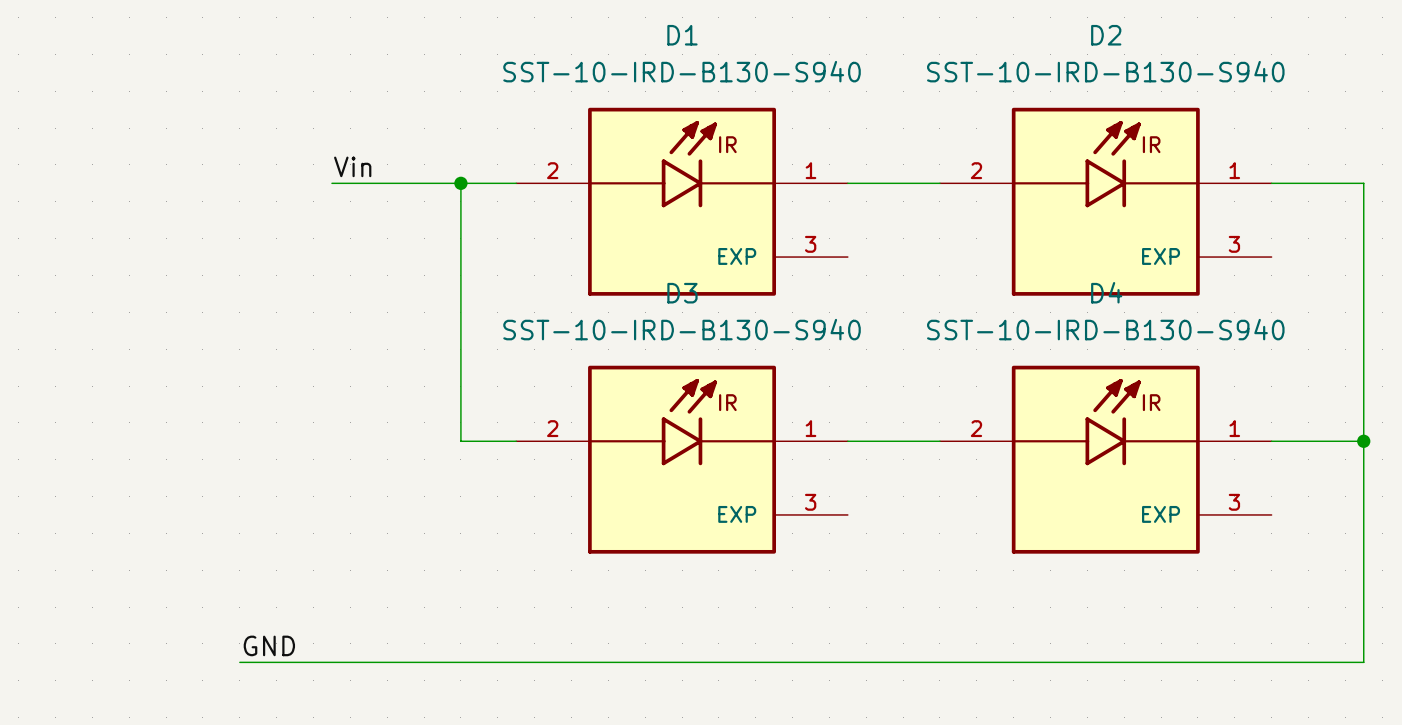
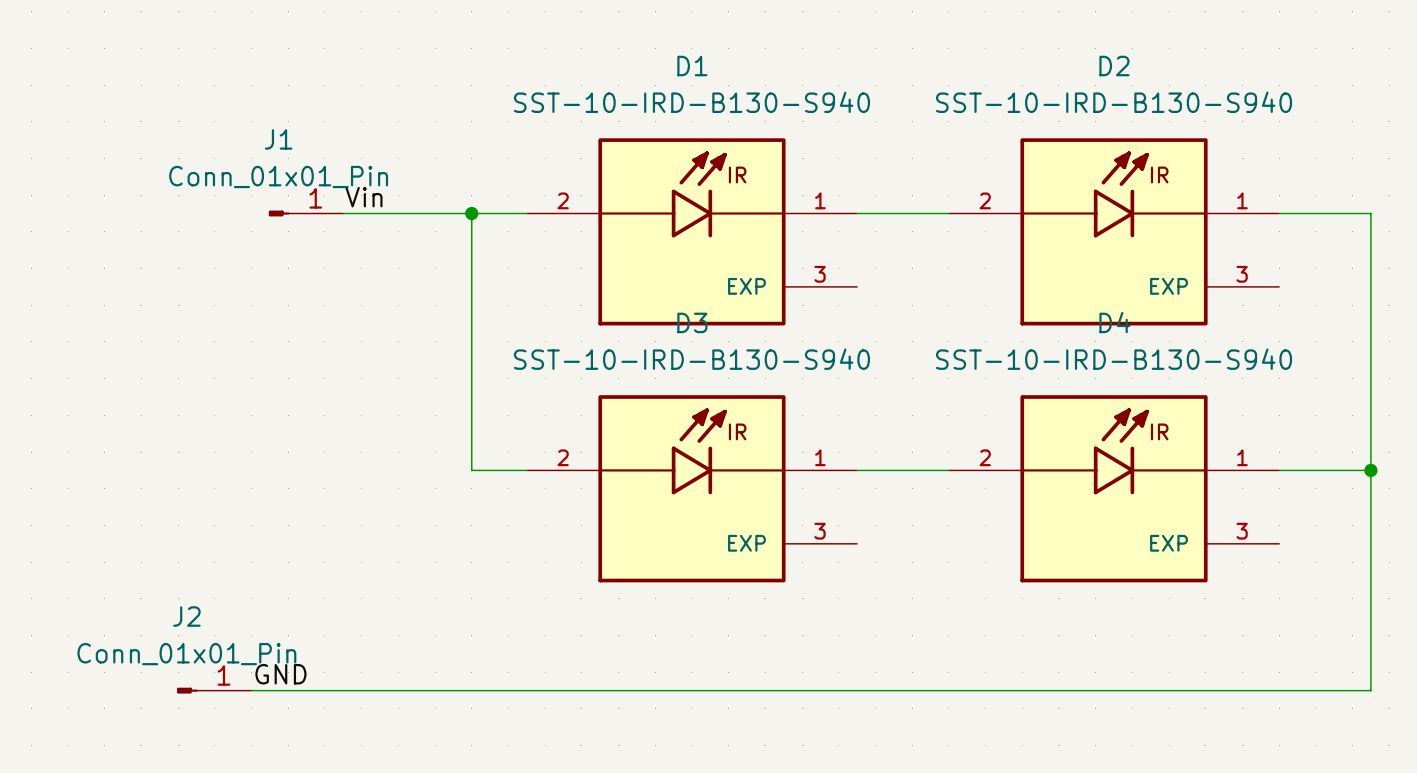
J1: none -> Conn_01x01_Pin (306, 213)
J2: none -> Conn_01x01_Pin (214, 690)

